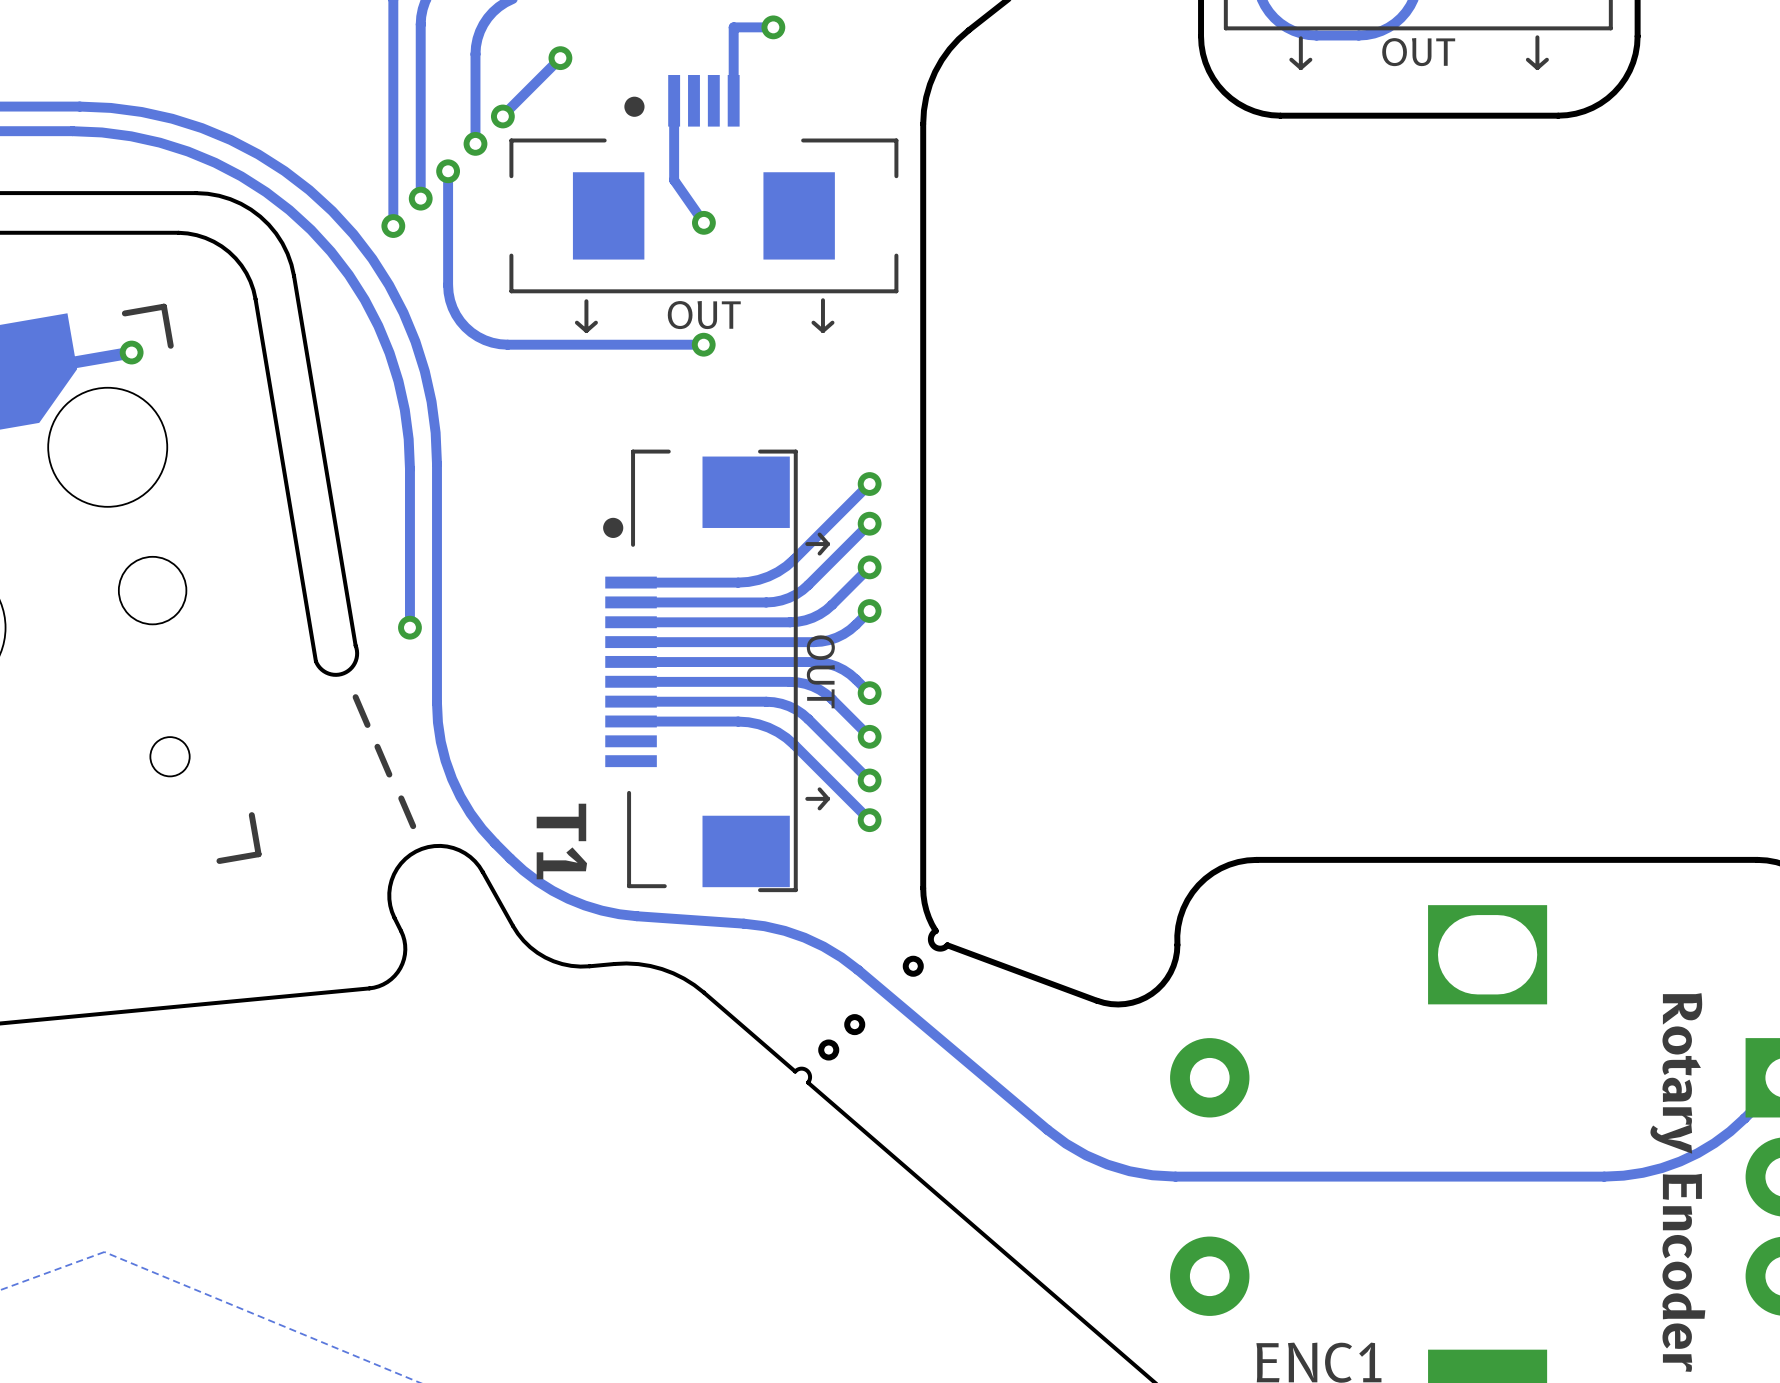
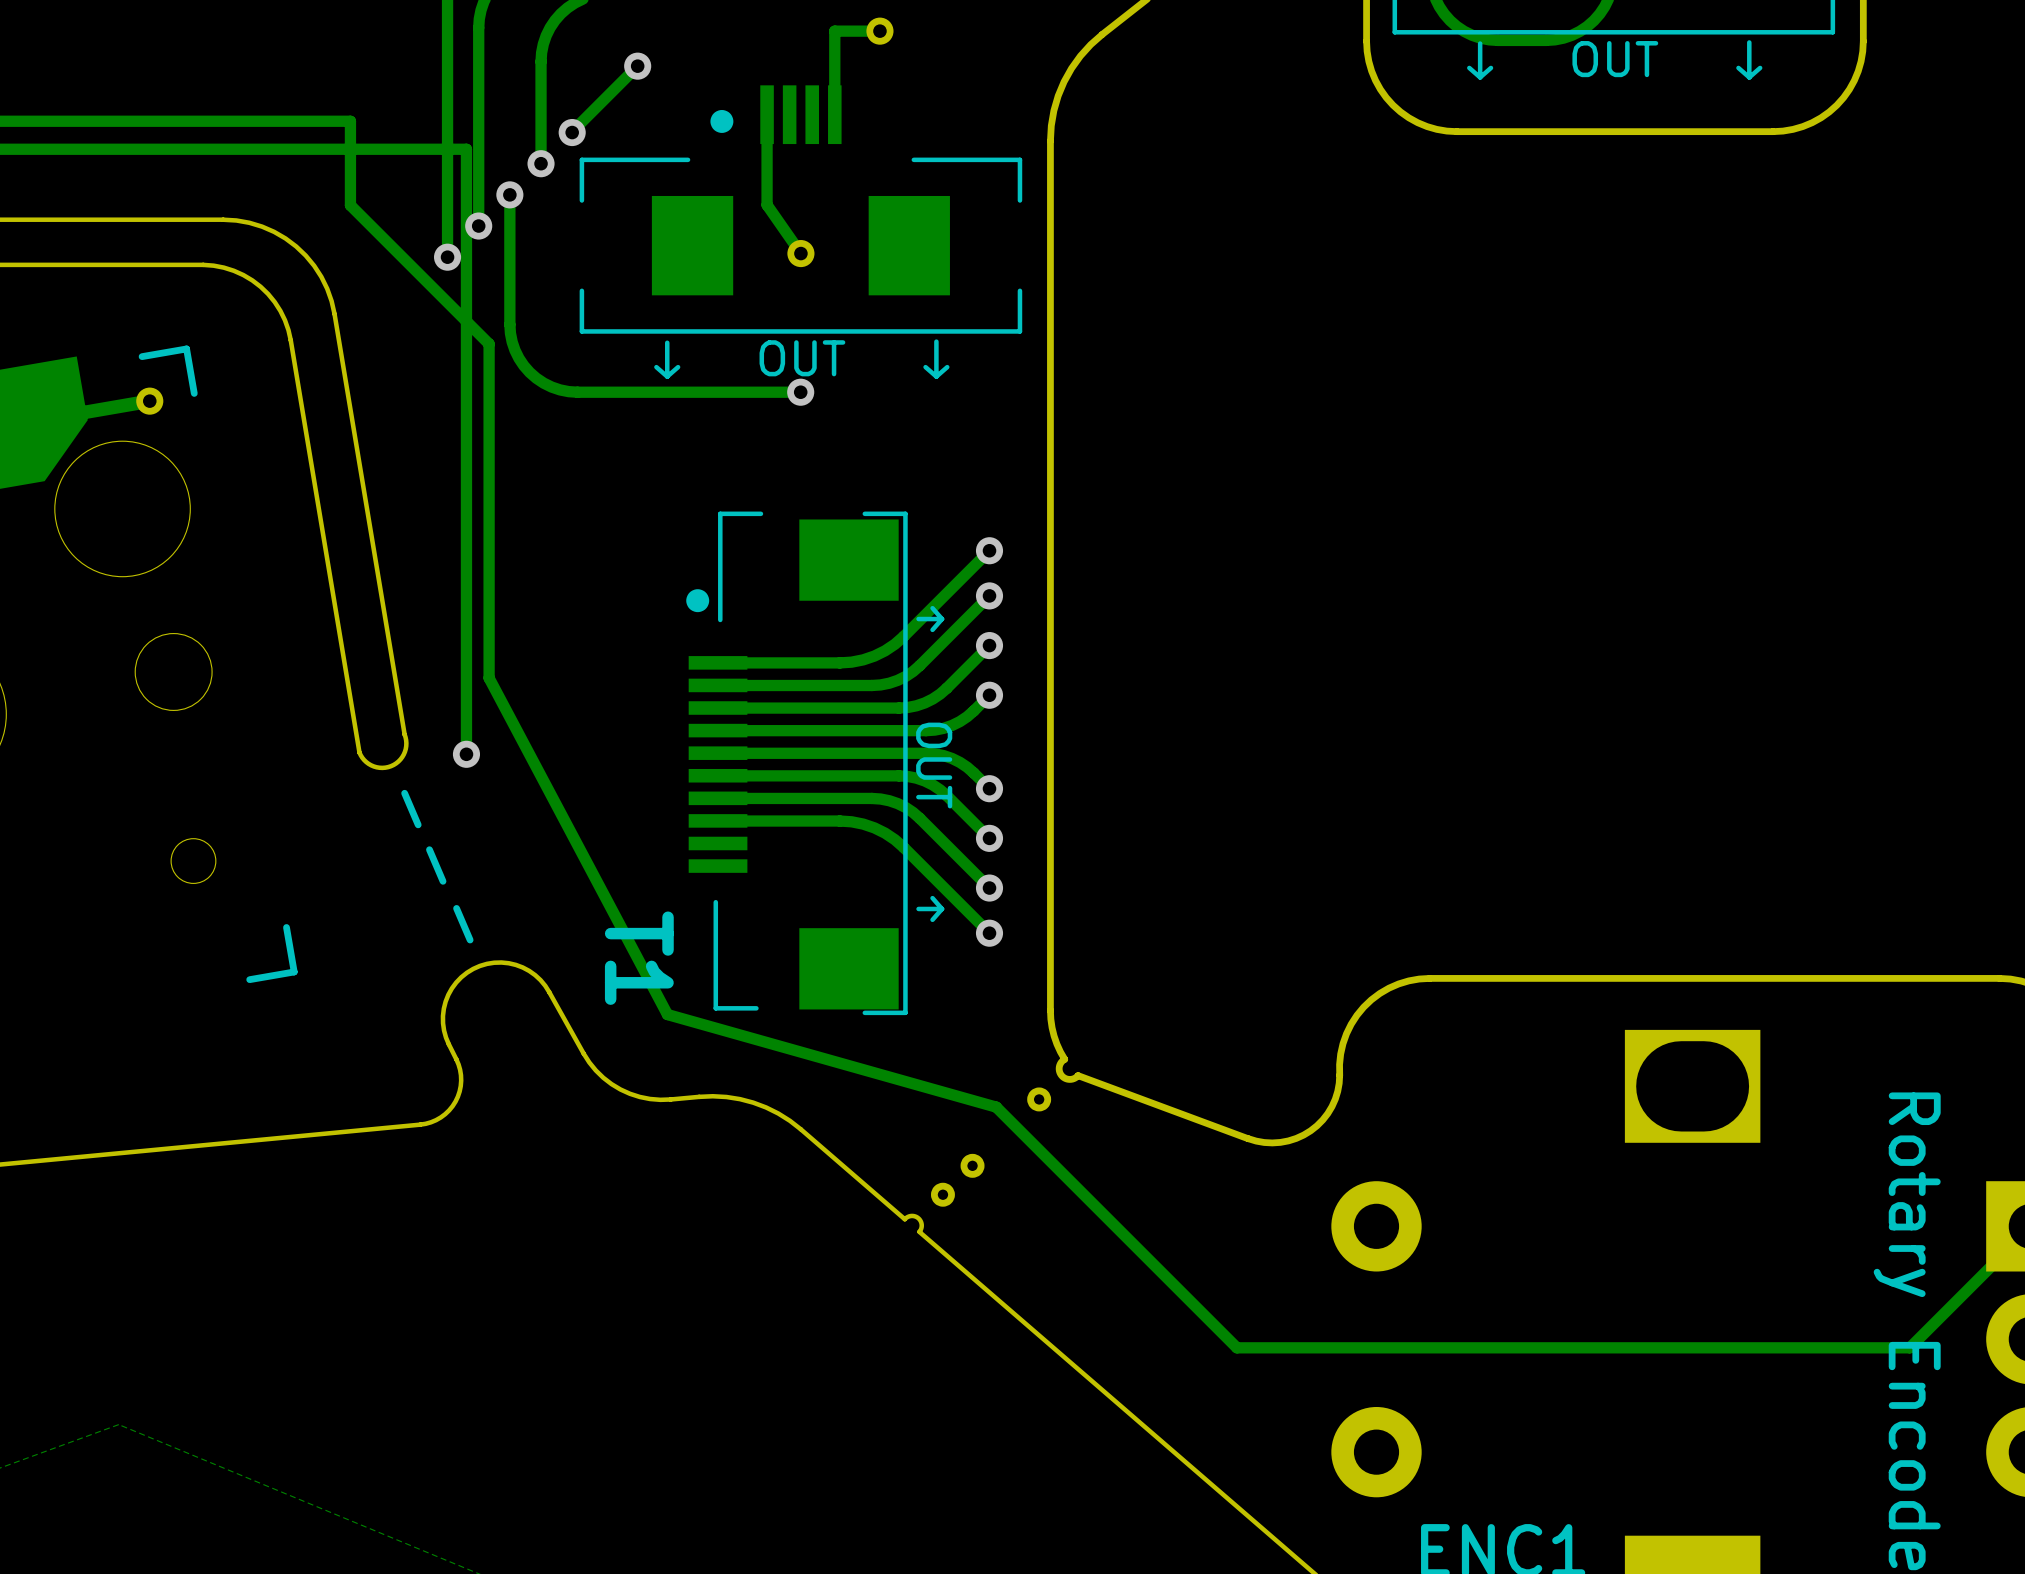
track: (79, 106) (110, 107) (172, 118) (230, 140) (258, 154) (309, 190) (332, 211) (353, 234) (389, 285) (415, 341) (431, 401) (435, 432) (436, 703) (440, 741) (445, 760) (460, 796) (482, 828) (523, 870) (552, 890) (584, 905) (619, 914) (764, 926) (784, 930) (823, 946) (858, 969) (1066, 1143) (1107, 1164) (1129, 1171) (1175, 1176) (1623, 1175) (1661, 1168) (1697, 1153) (1730, 1131) (1744, 1118) -> (90, 121) (350, 121) (350, 205) (489, 343) (489, 678) (667, 1014) (996, 1107) (1236, 1347) (1909, 1347) (1985, 1272)
track: (72, 131) (131, 136) (187, 151) (241, 176) (289, 210) (311, 229) (331, 251) (364, 299) (389, 353) (404, 409) (409, 468) -> (82, 149) (466, 149) (466, 533)
track: none -> (466, 714) (466, 754)
via position: (409, 627) -> (466, 754)

